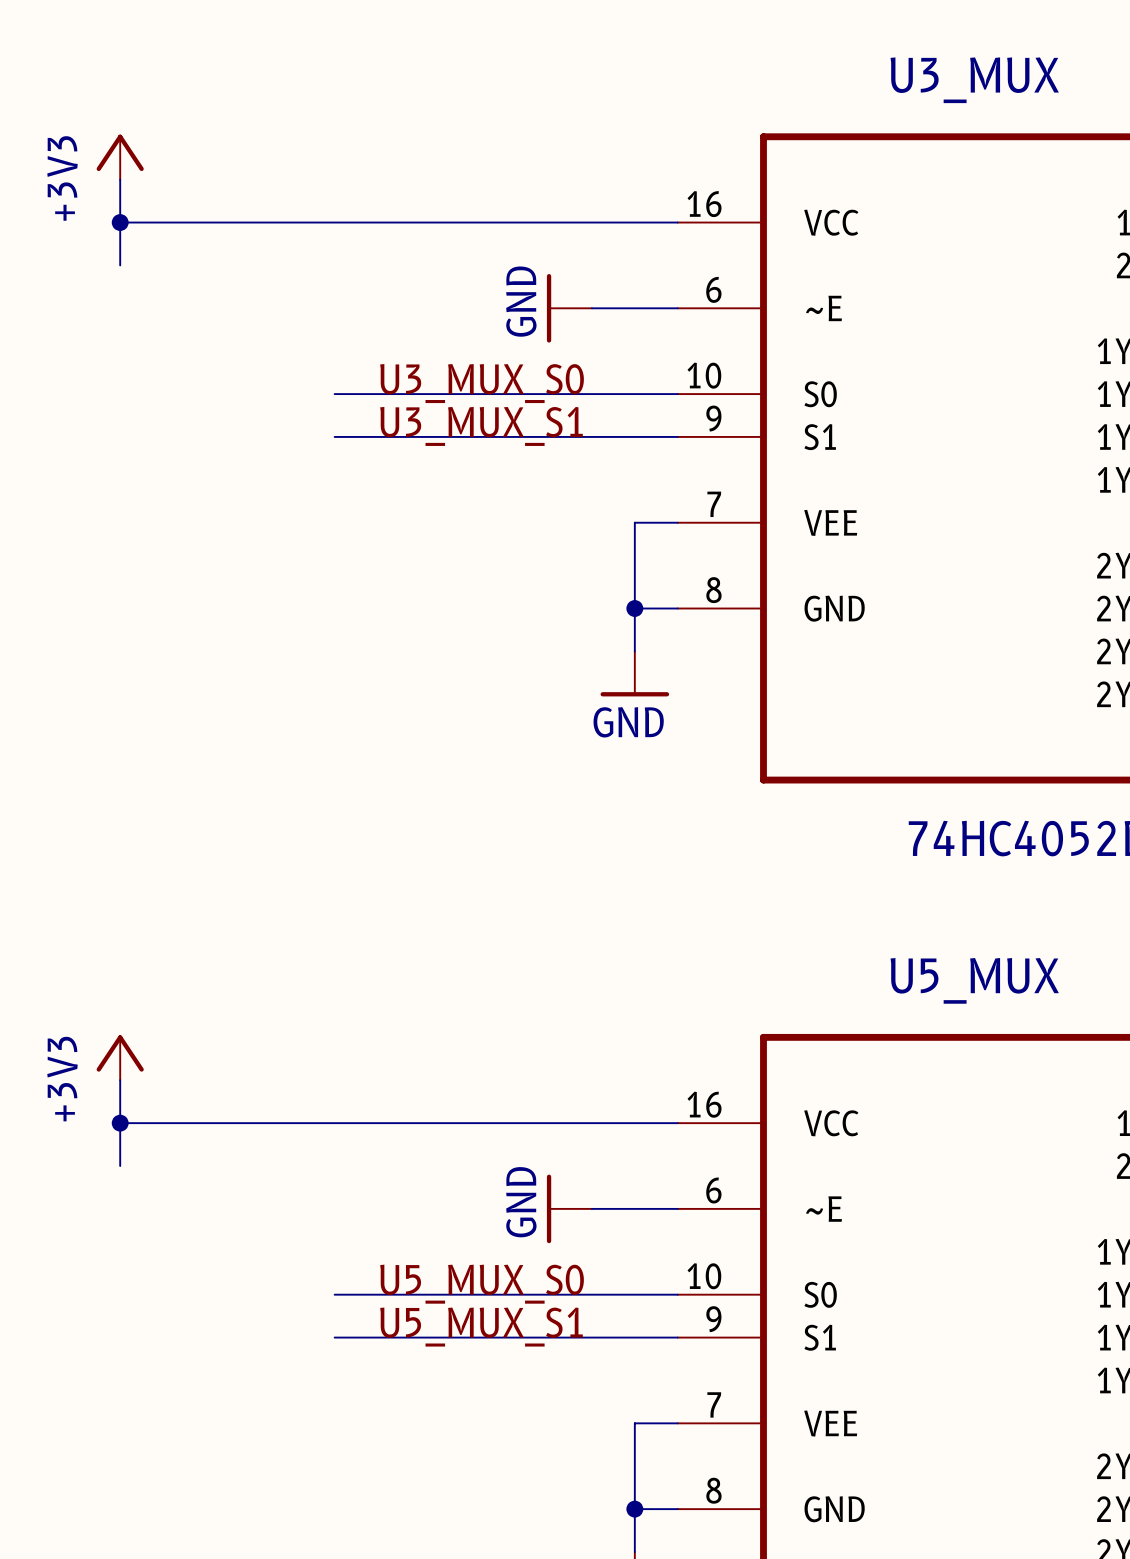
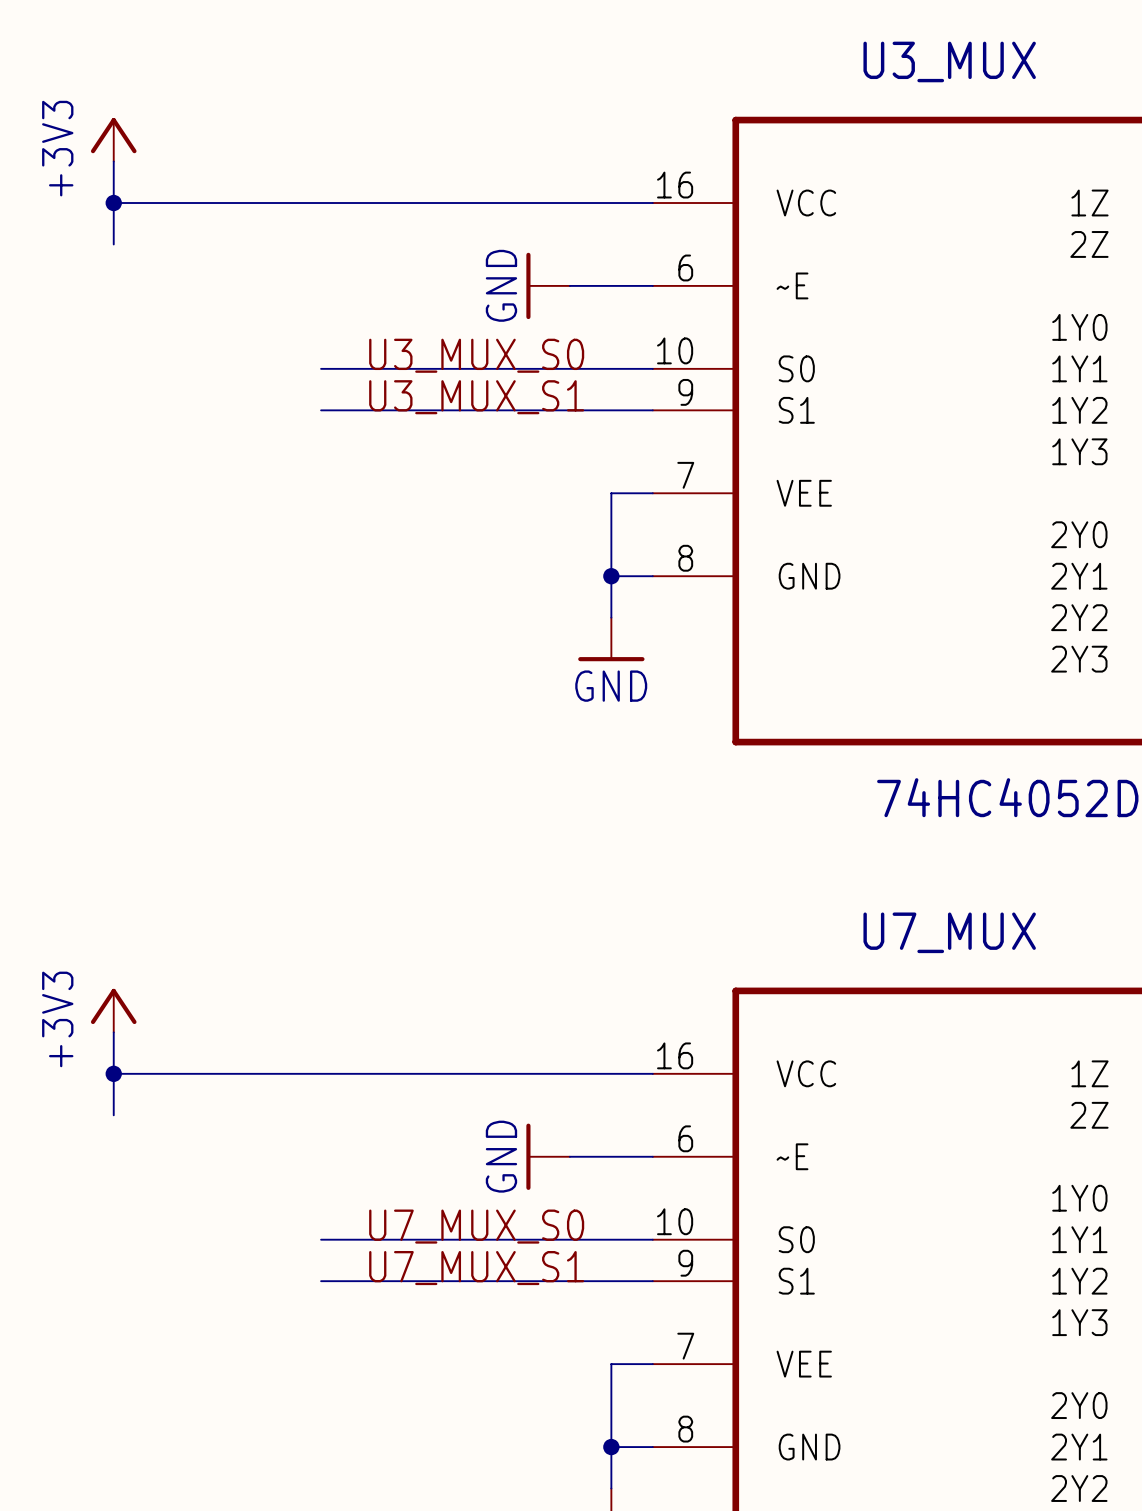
U5_MUX name: U5_MUX (974, 980) -> U7_MUX (949, 932)
label: U5_MUX_S0 (482, 1284) -> U7_MUX_S0 (476, 1226)
label: U5_MUX_S1 (481, 1327) -> U7_MUX_S1 (476, 1268)

